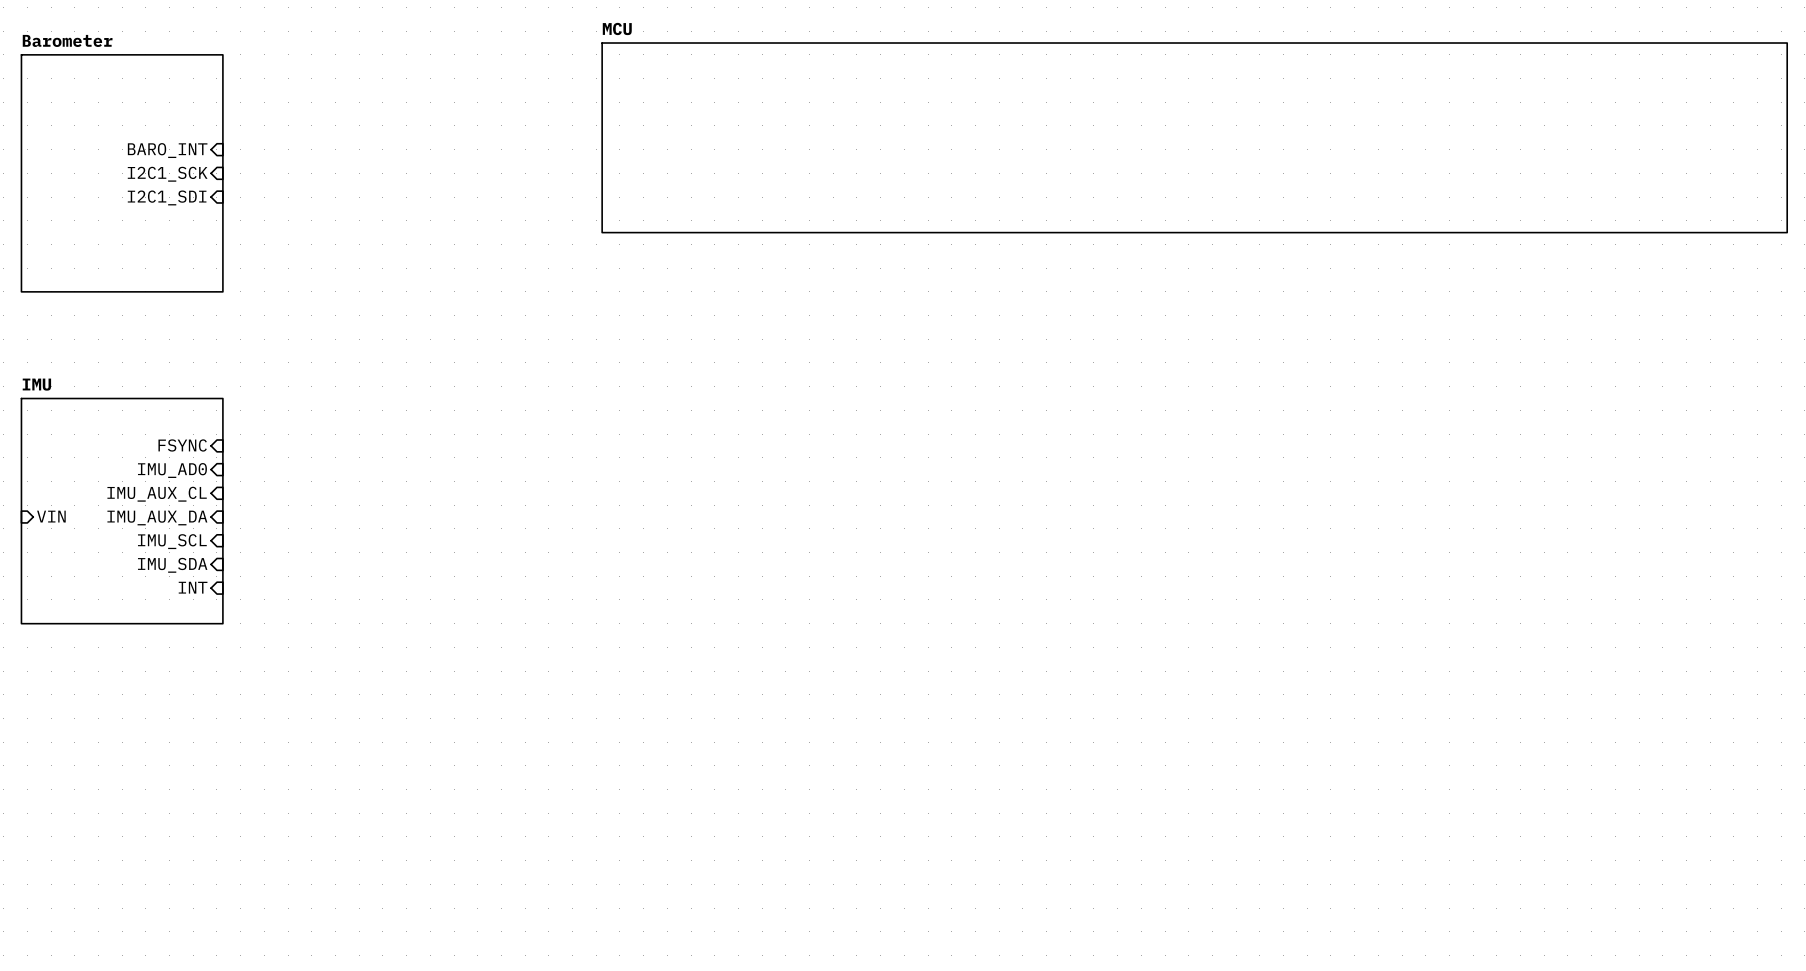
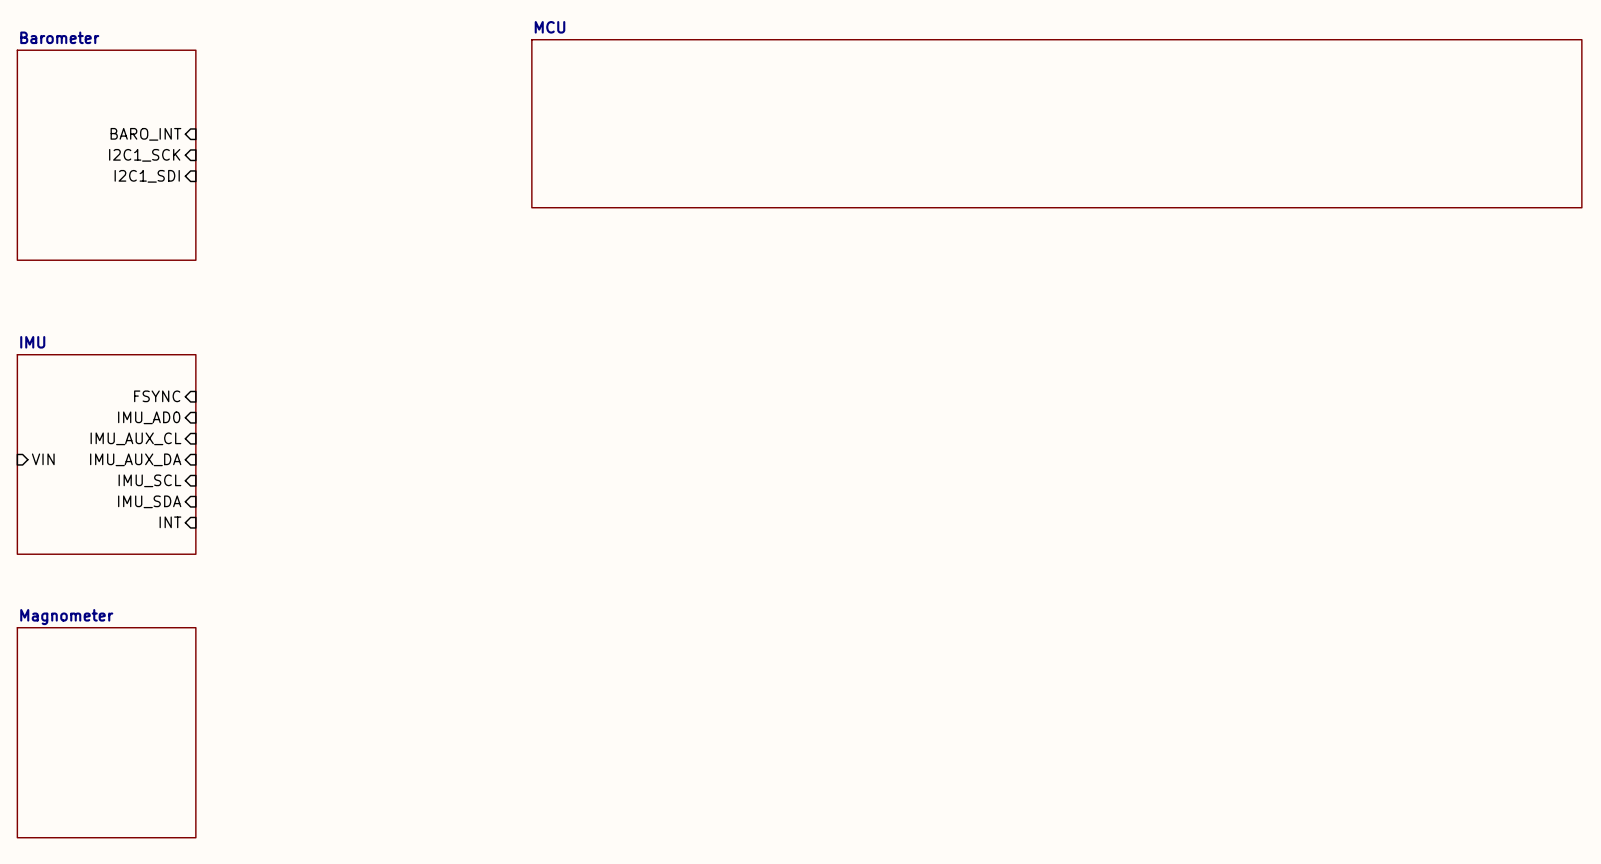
sheet Magnometer: none -> (106, 732)

